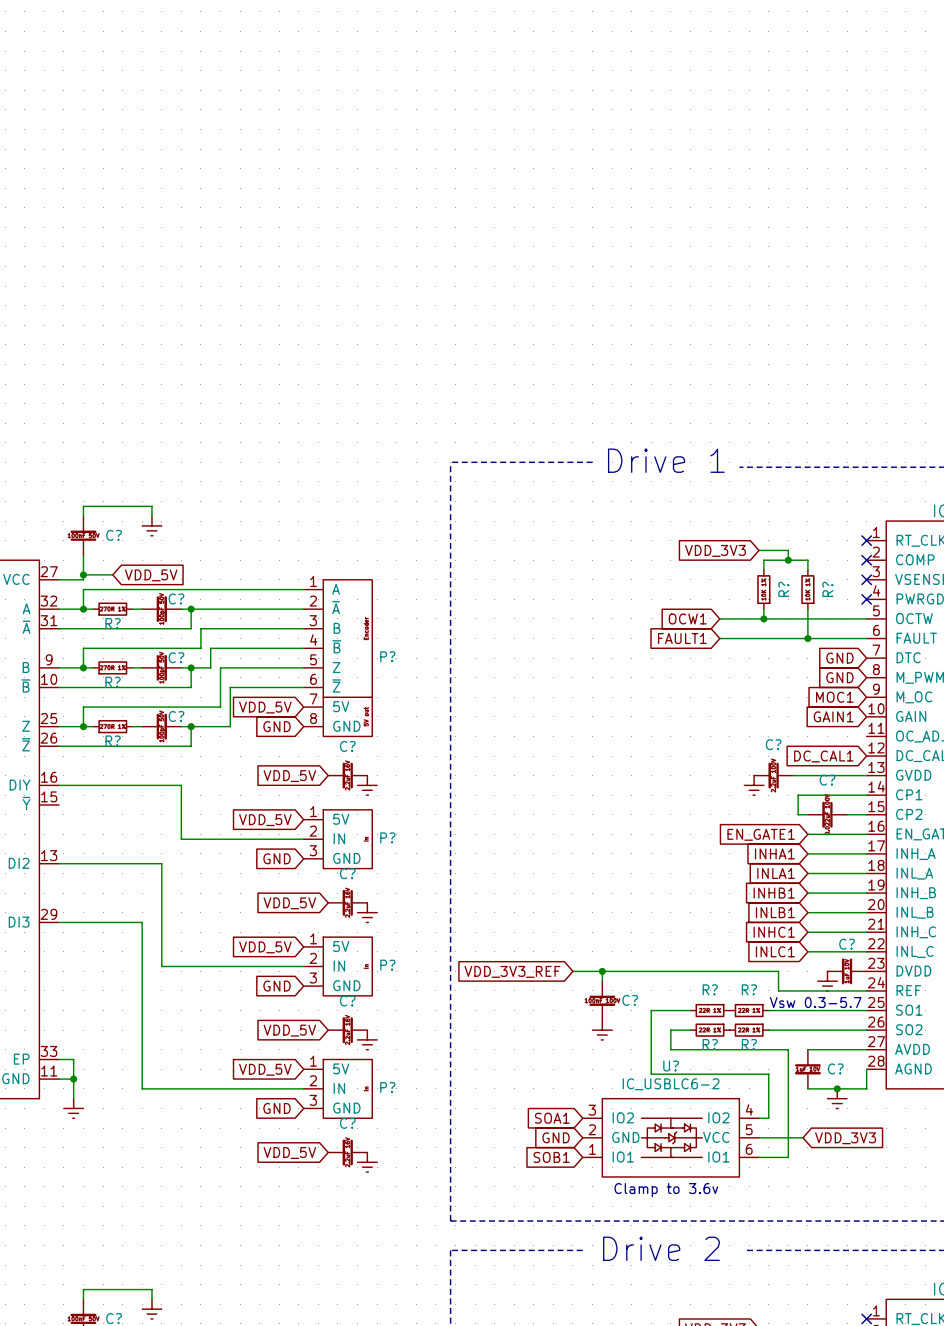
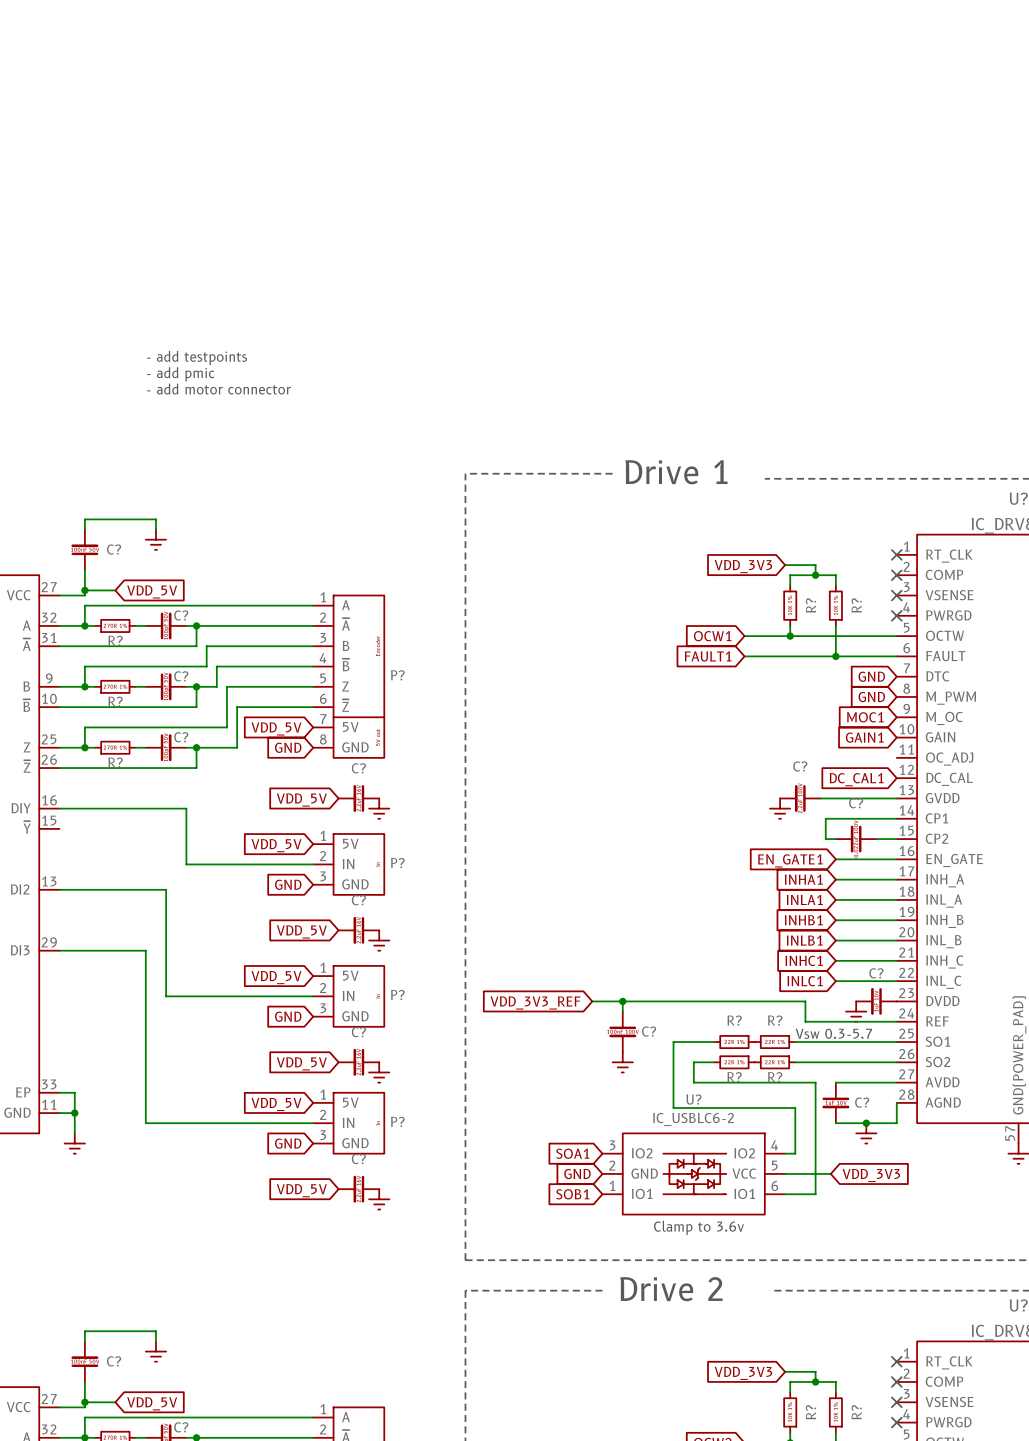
text: none -> - add testpoints (197, 357)
text: none -> - add pmic (180, 374)
text: none -> - add motor connector (219, 389)

